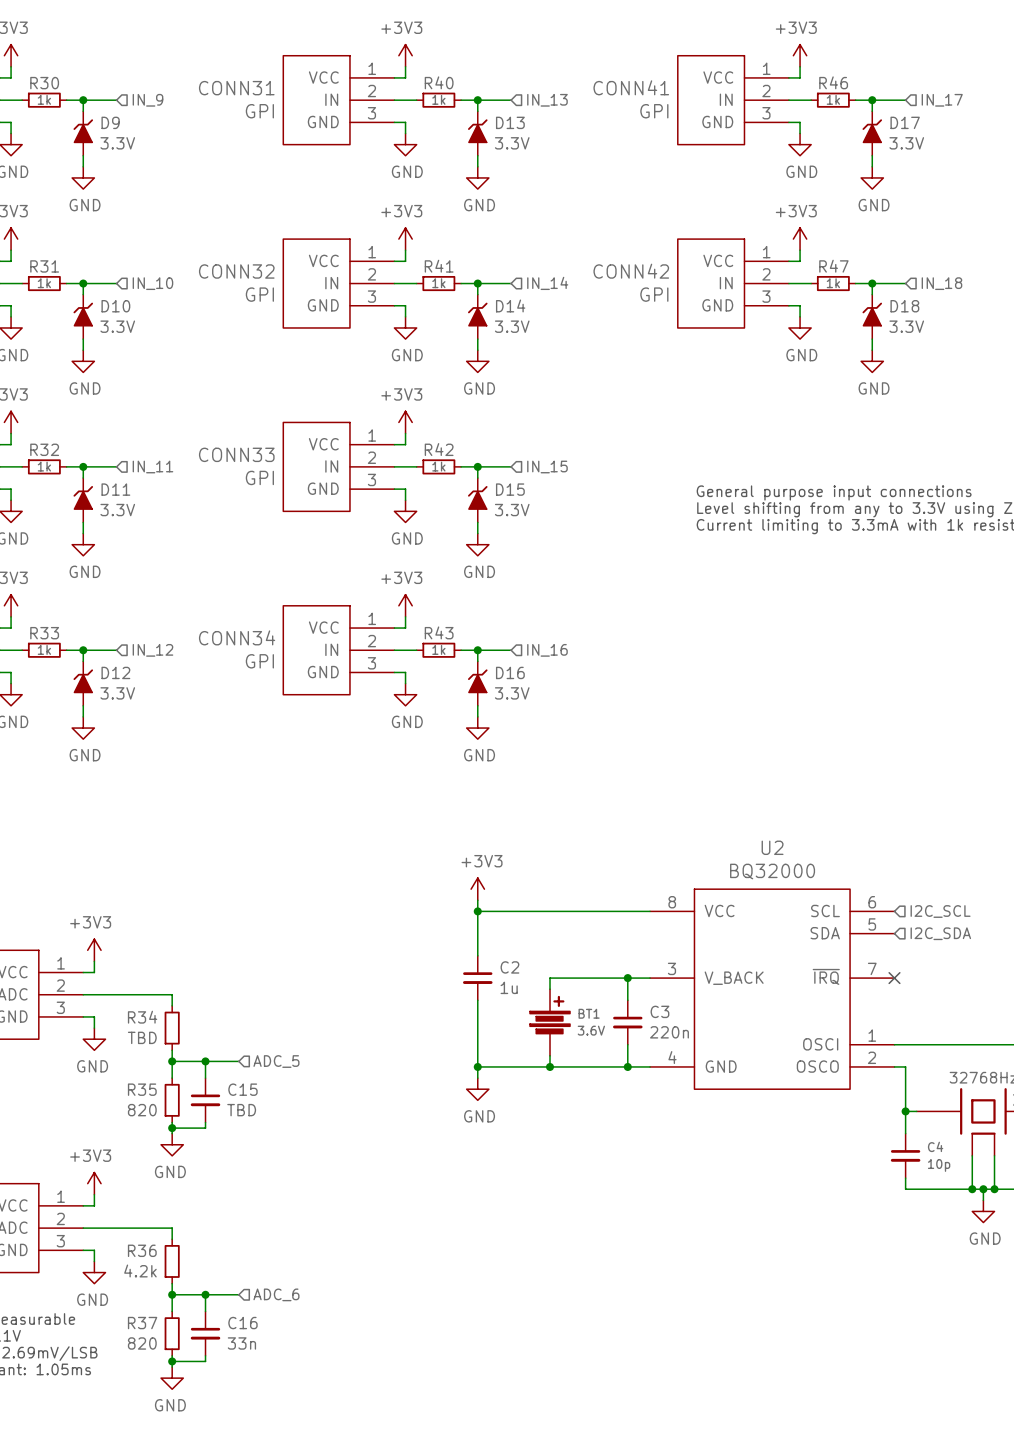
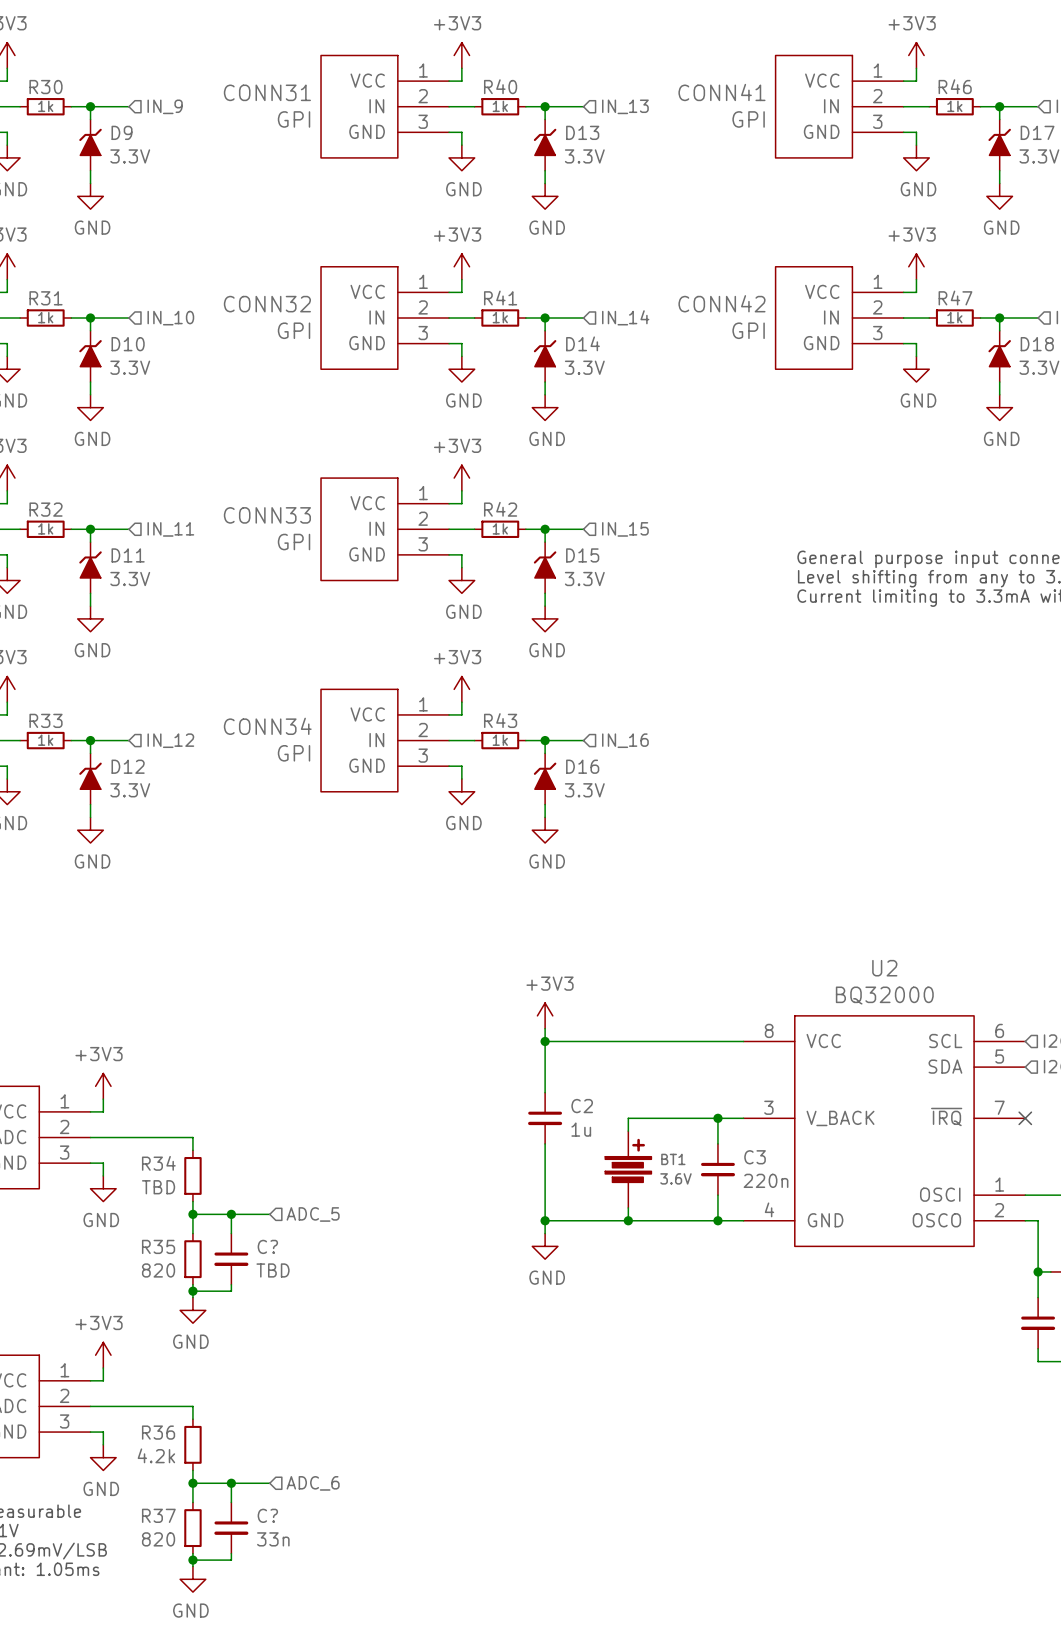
C15 name: C15 (242, 1089) -> C? (267, 1246)
C16 name: C16 (242, 1323) -> C? (267, 1515)

